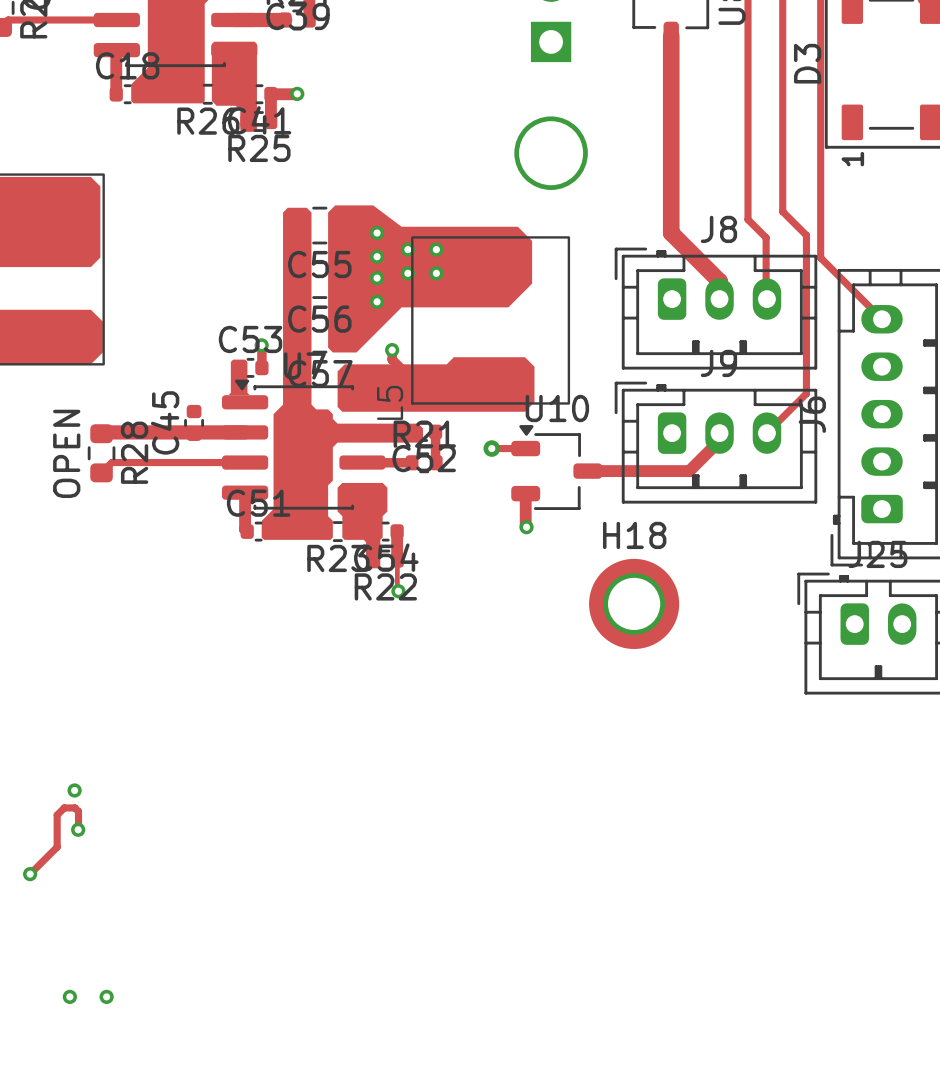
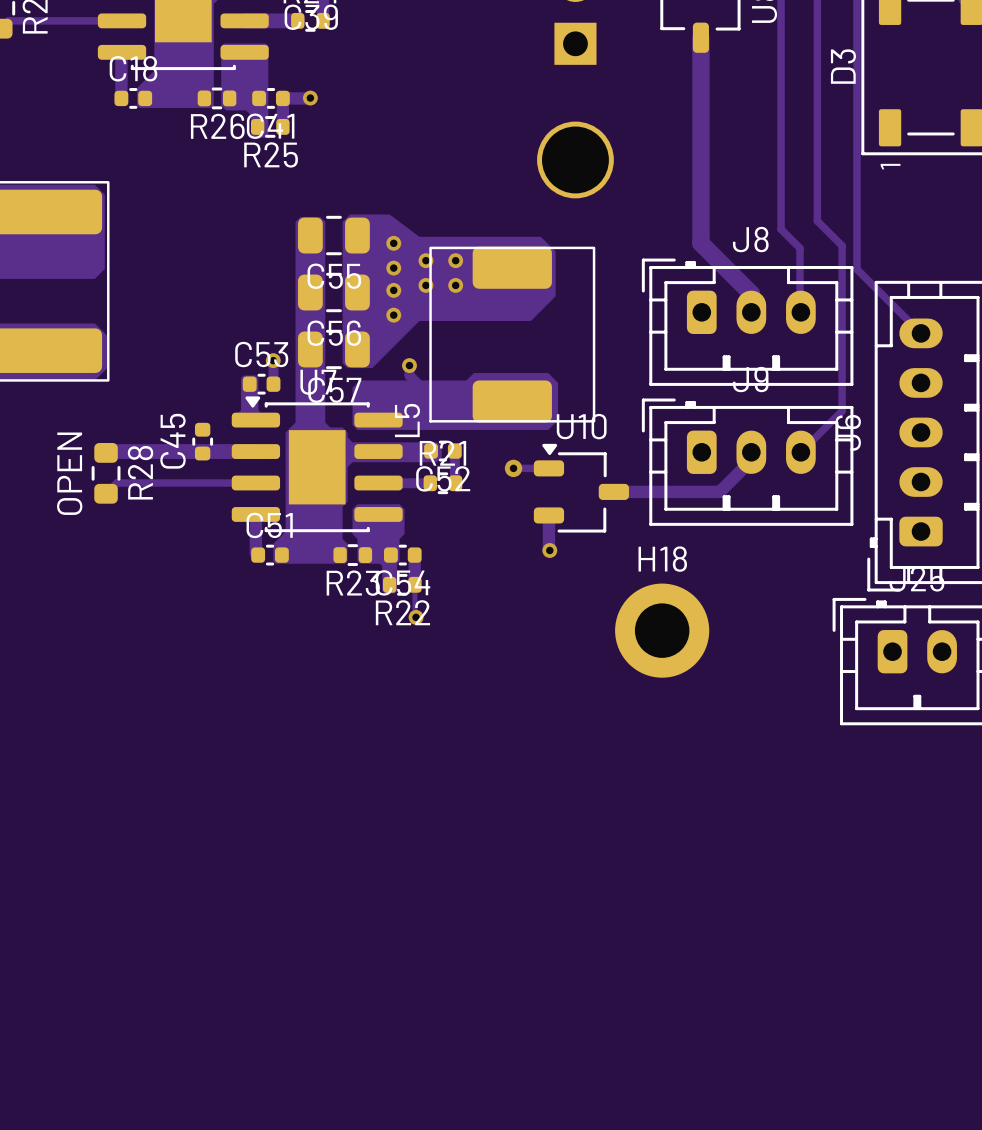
via: (74, 790) -> none
track: (78, 829) (78, 811) (74, 807) (64, 807) (57, 815) (57, 847) (30, 874) -> none
via: (78, 829) -> none
via: (30, 874) -> none
via: (69, 996) -> none
via: (106, 996) -> none

